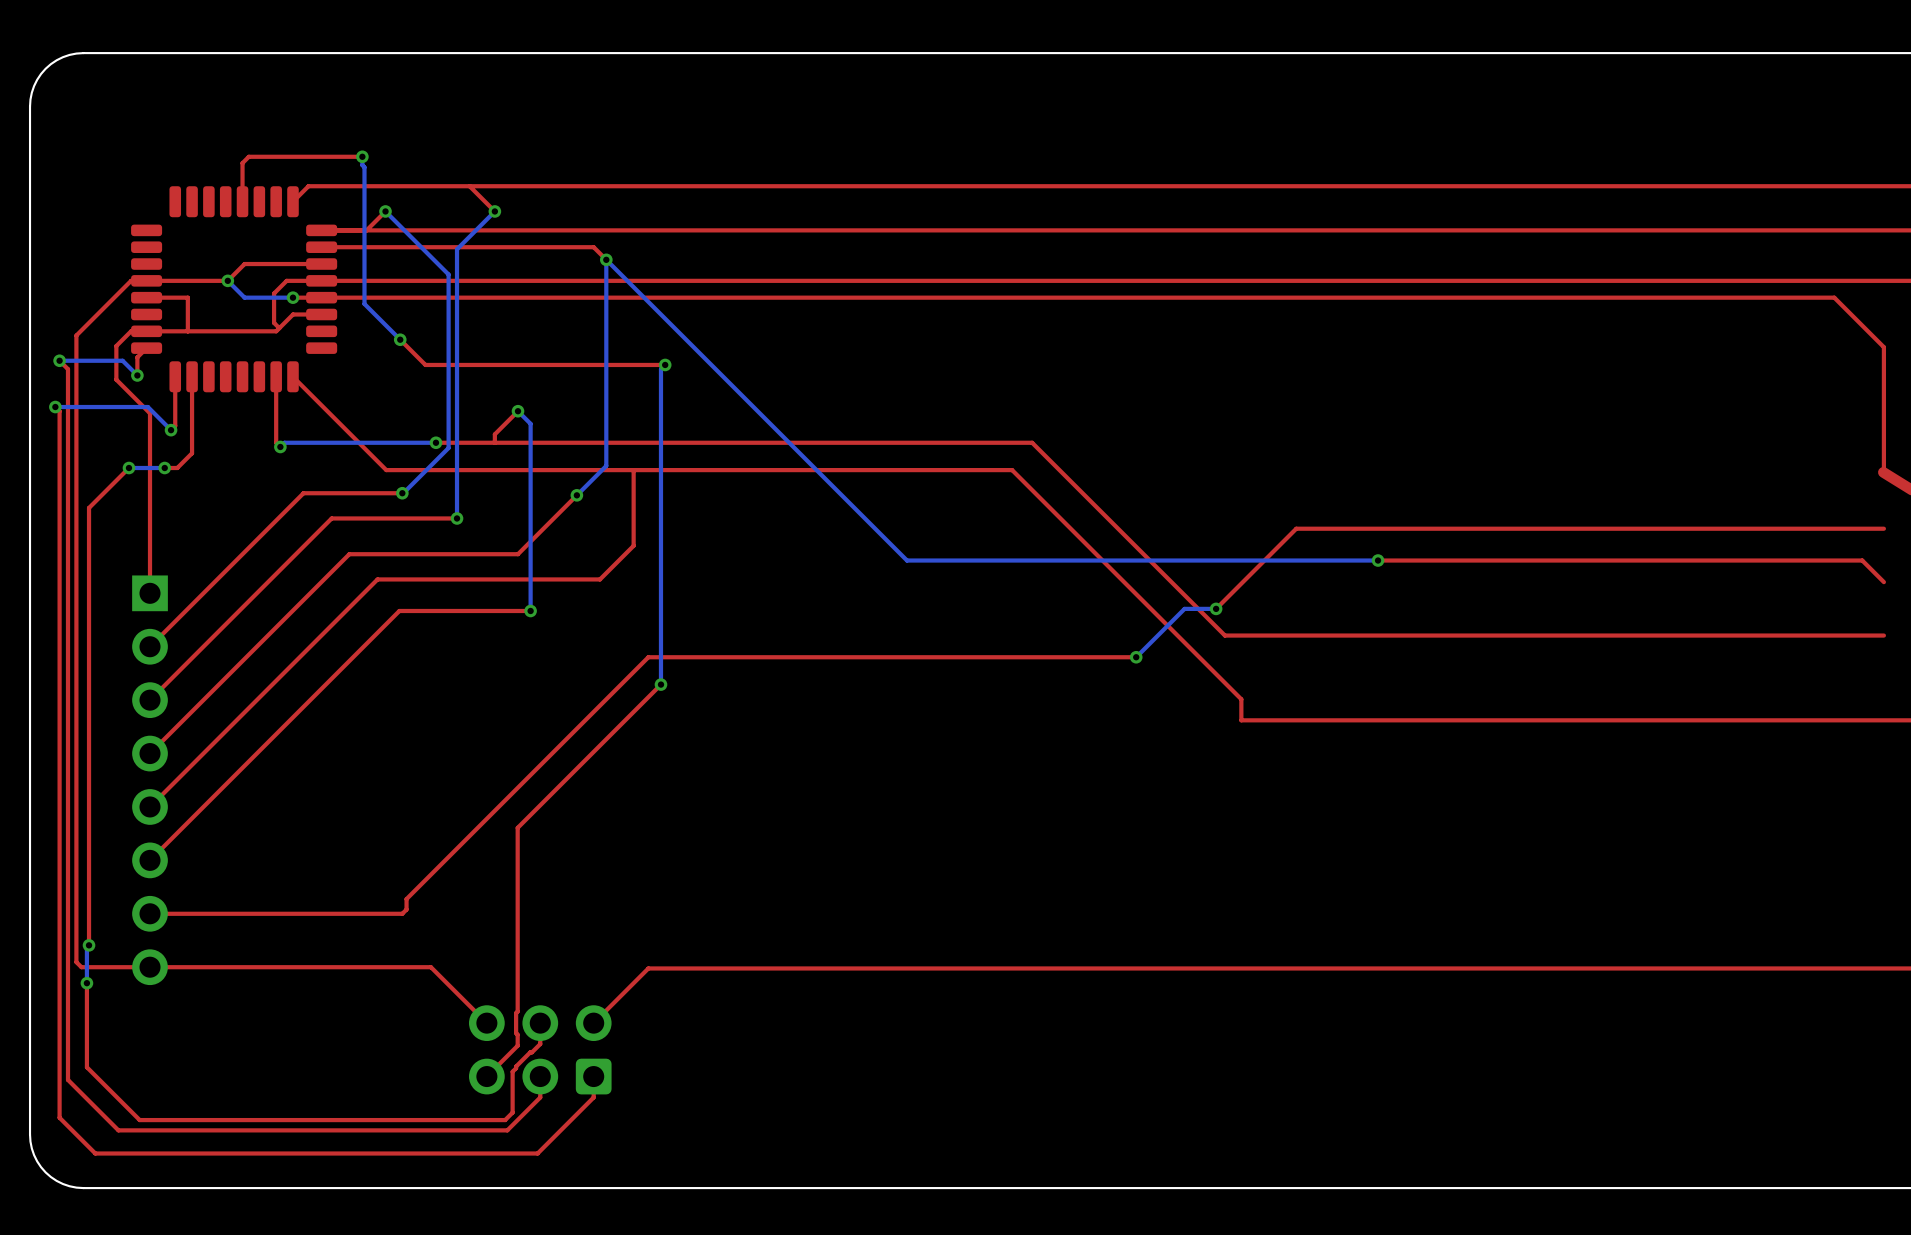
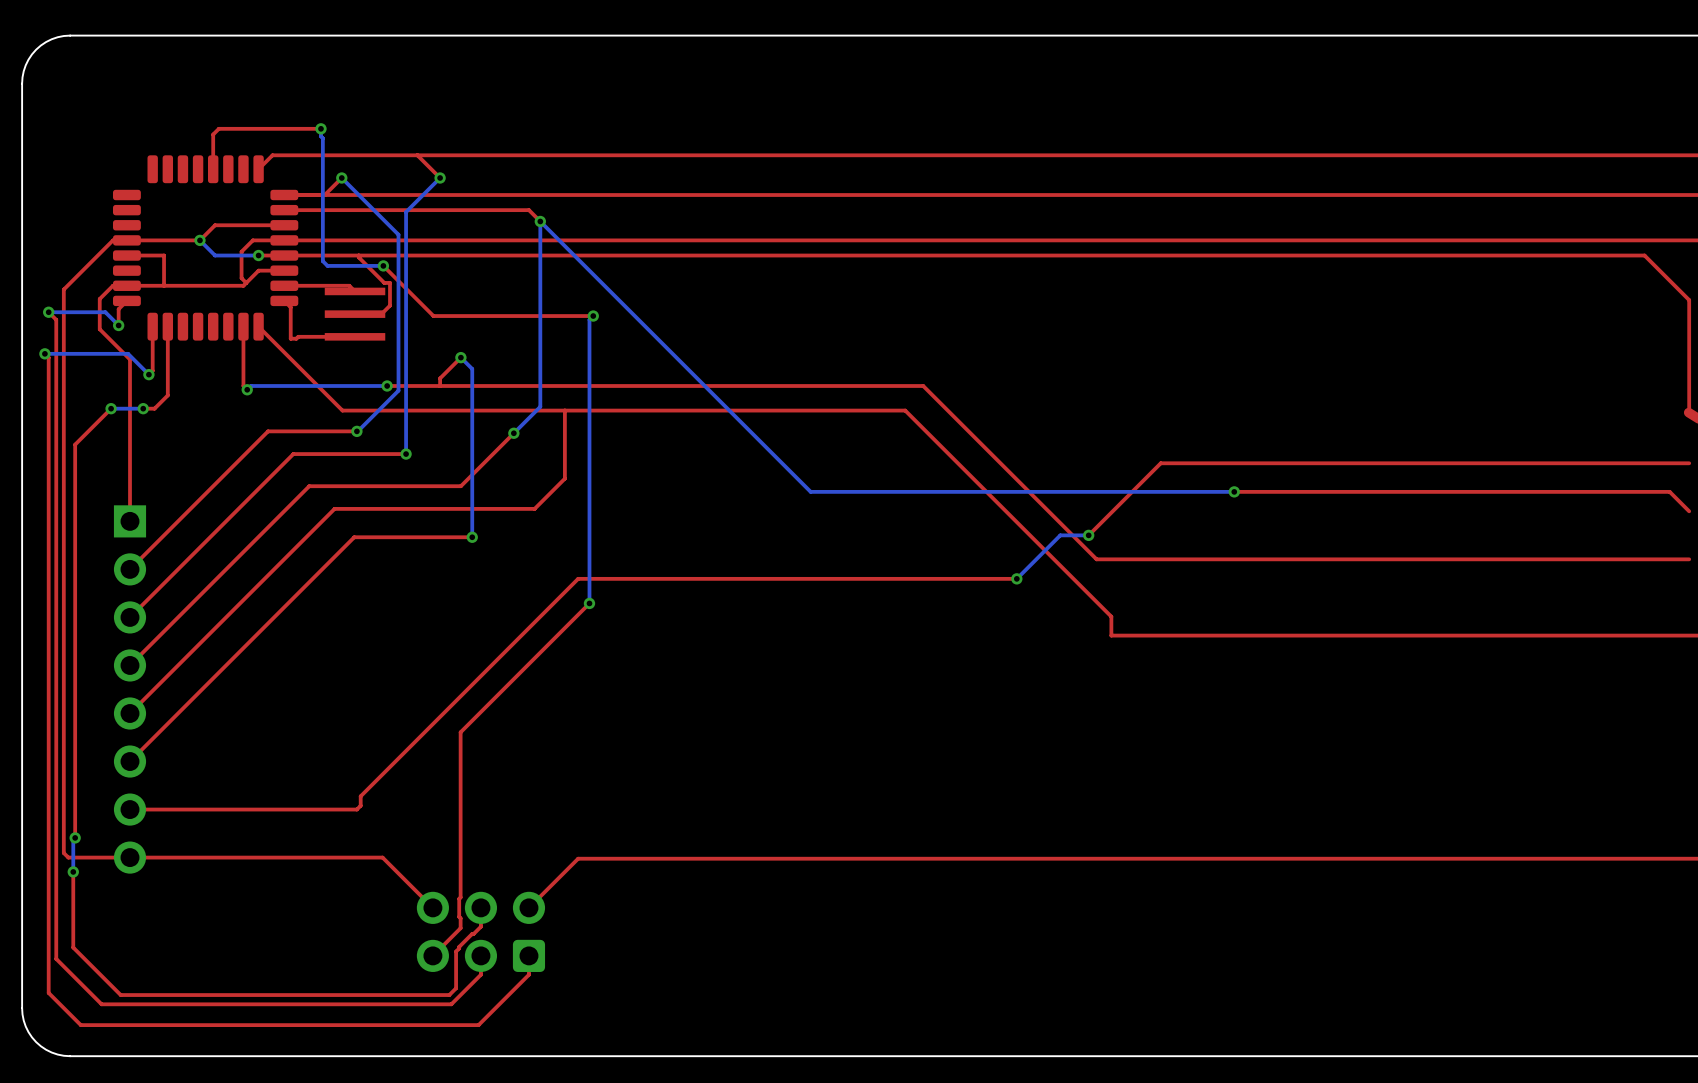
top track: none -> (358, 255) (384, 282) (390, 282) (390, 305) (381, 314) (355, 314)
bottom track: (369, 309) (400, 339) -> (327, 265) (383, 265)
top track: none -> (284, 285) (349, 285) (355, 291)
top track: (400, 339) (425, 364) (487, 364) -> (383, 265) (433, 316)
via position: (400, 339) -> (383, 265)
top track: none -> (284, 300) (290, 307) (290, 338) (298, 336) (355, 336)
part: none -> (355, 314)

